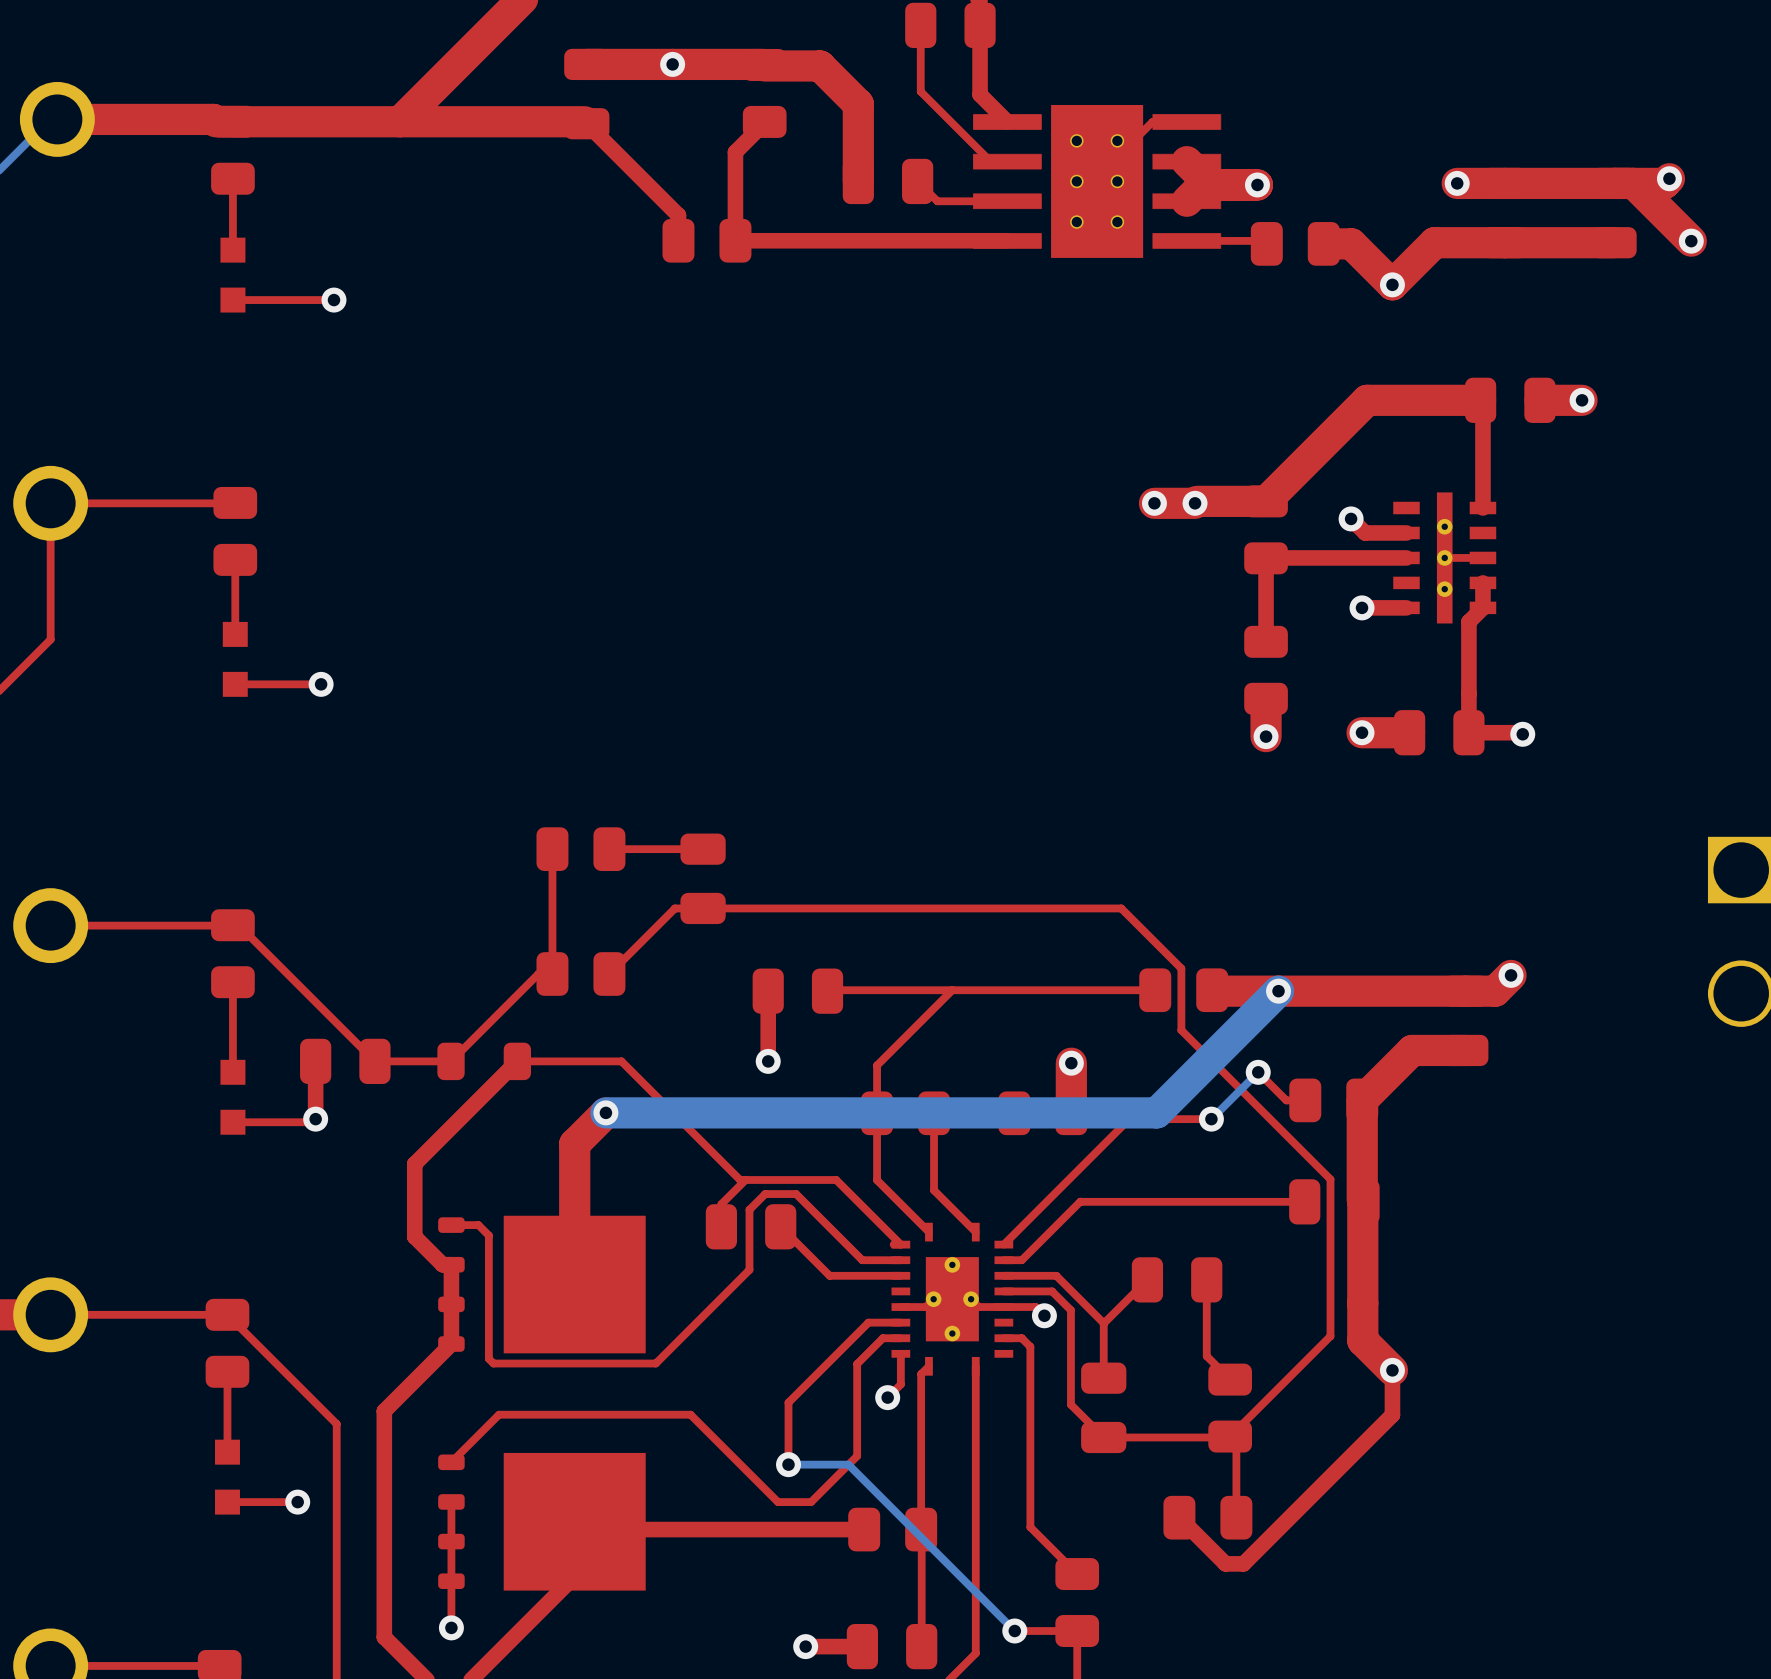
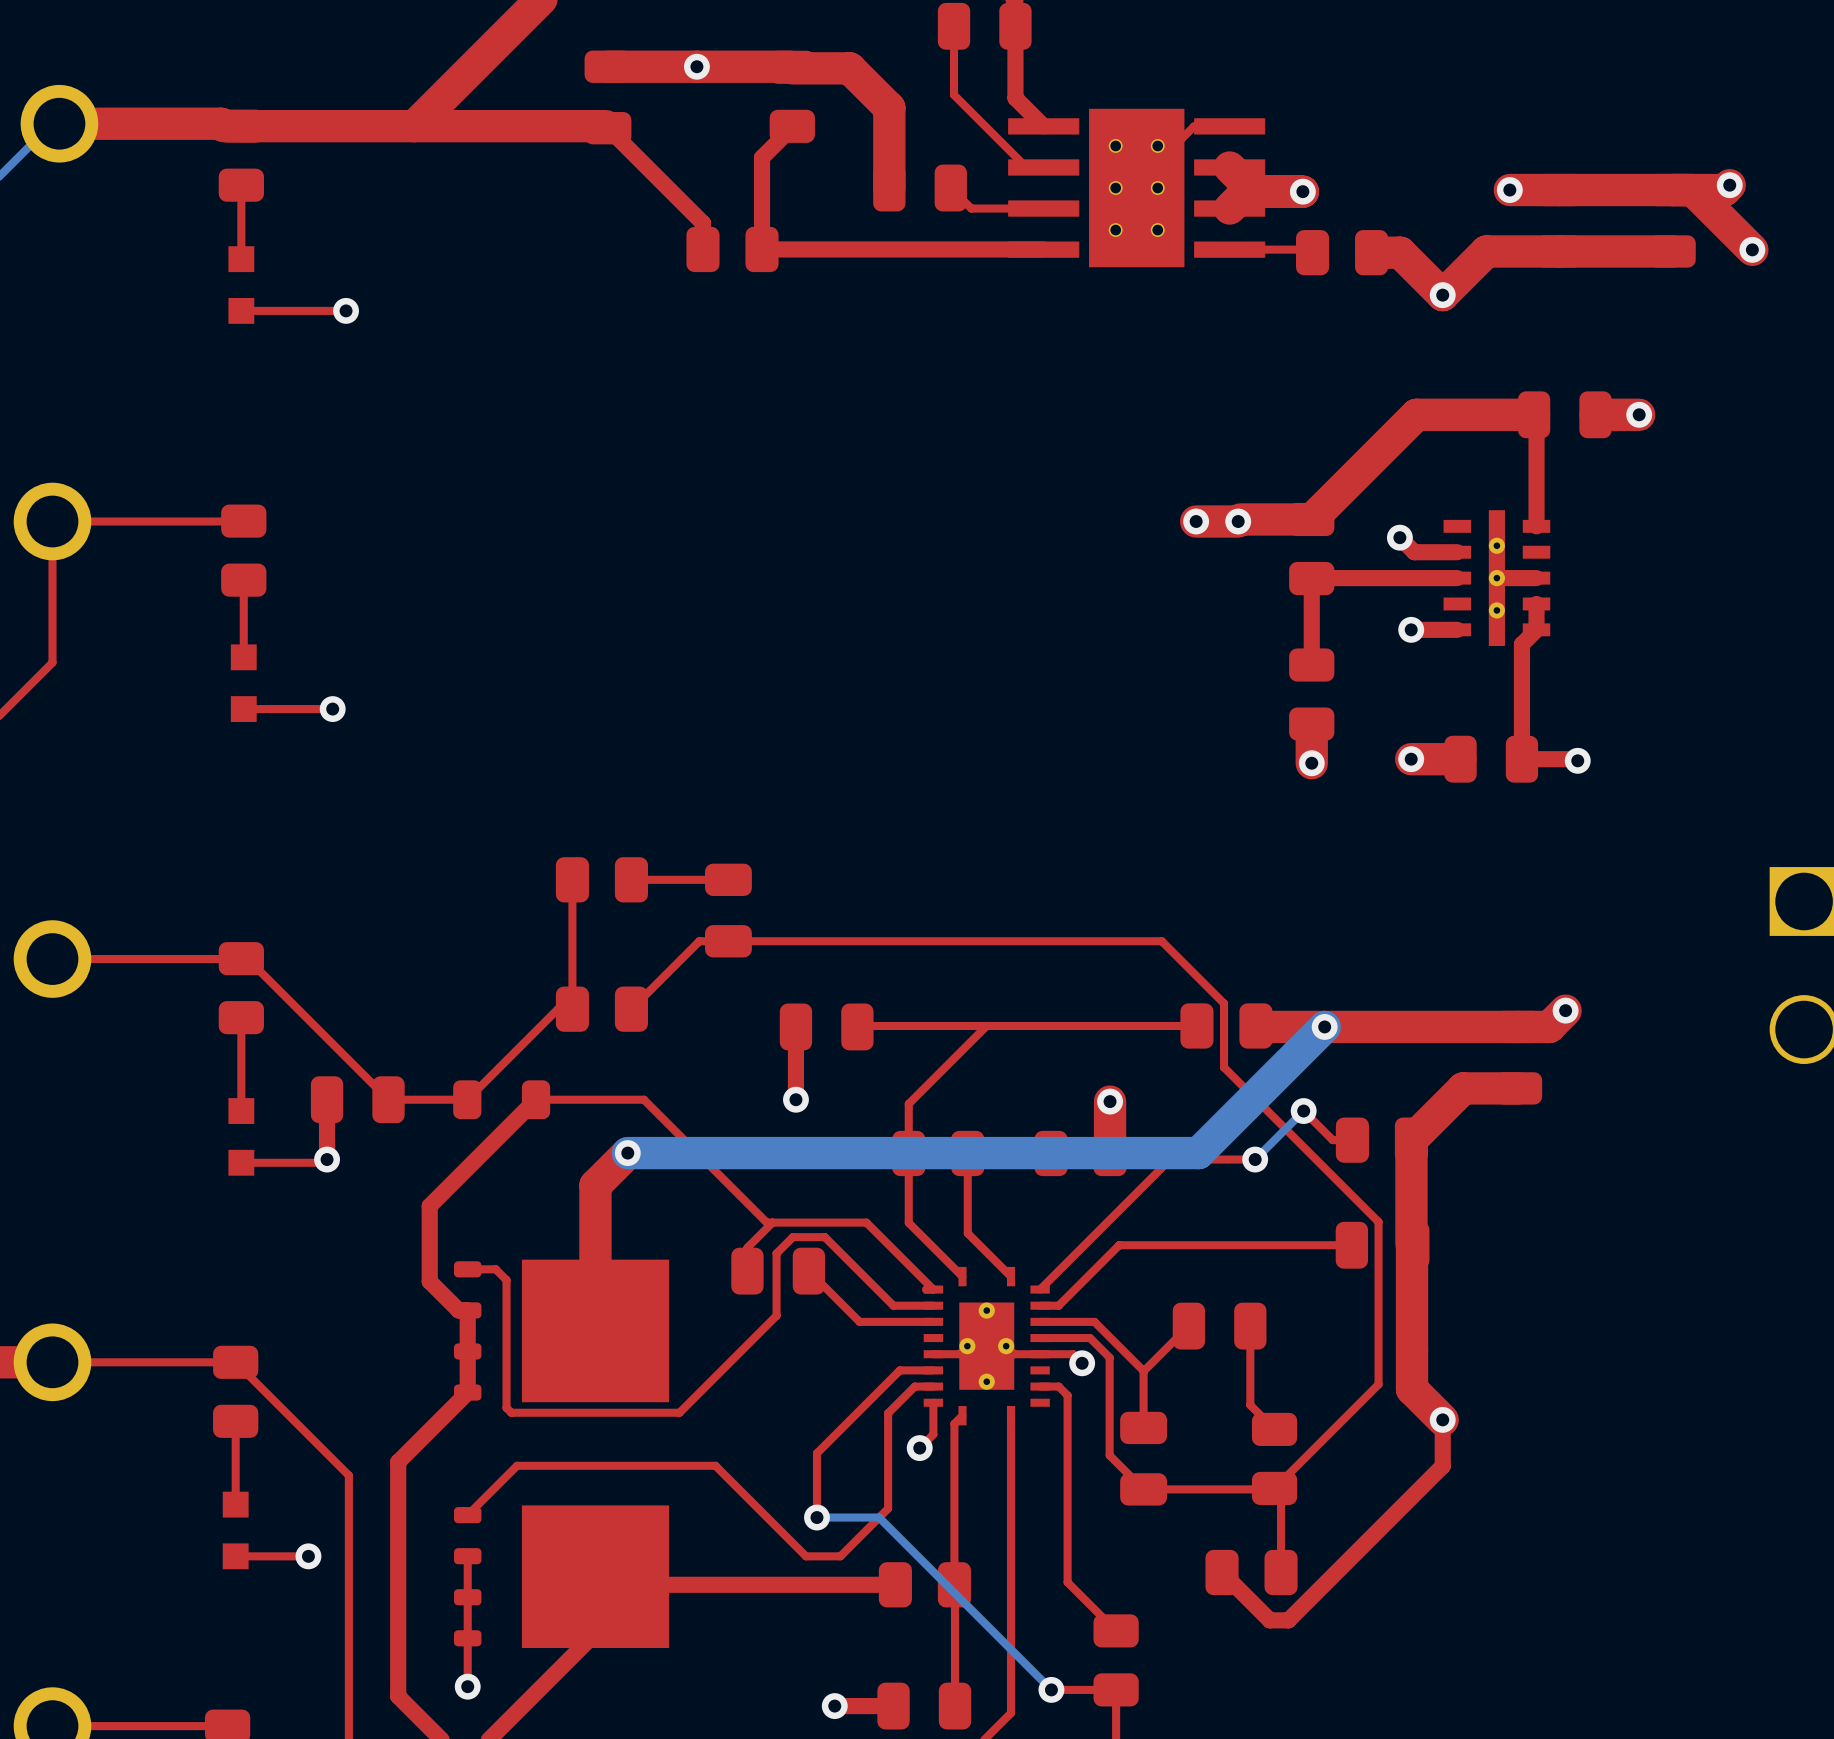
top track width: thin (1482, 557) (1444, 557) -> thick (1536, 578) (1496, 578)

